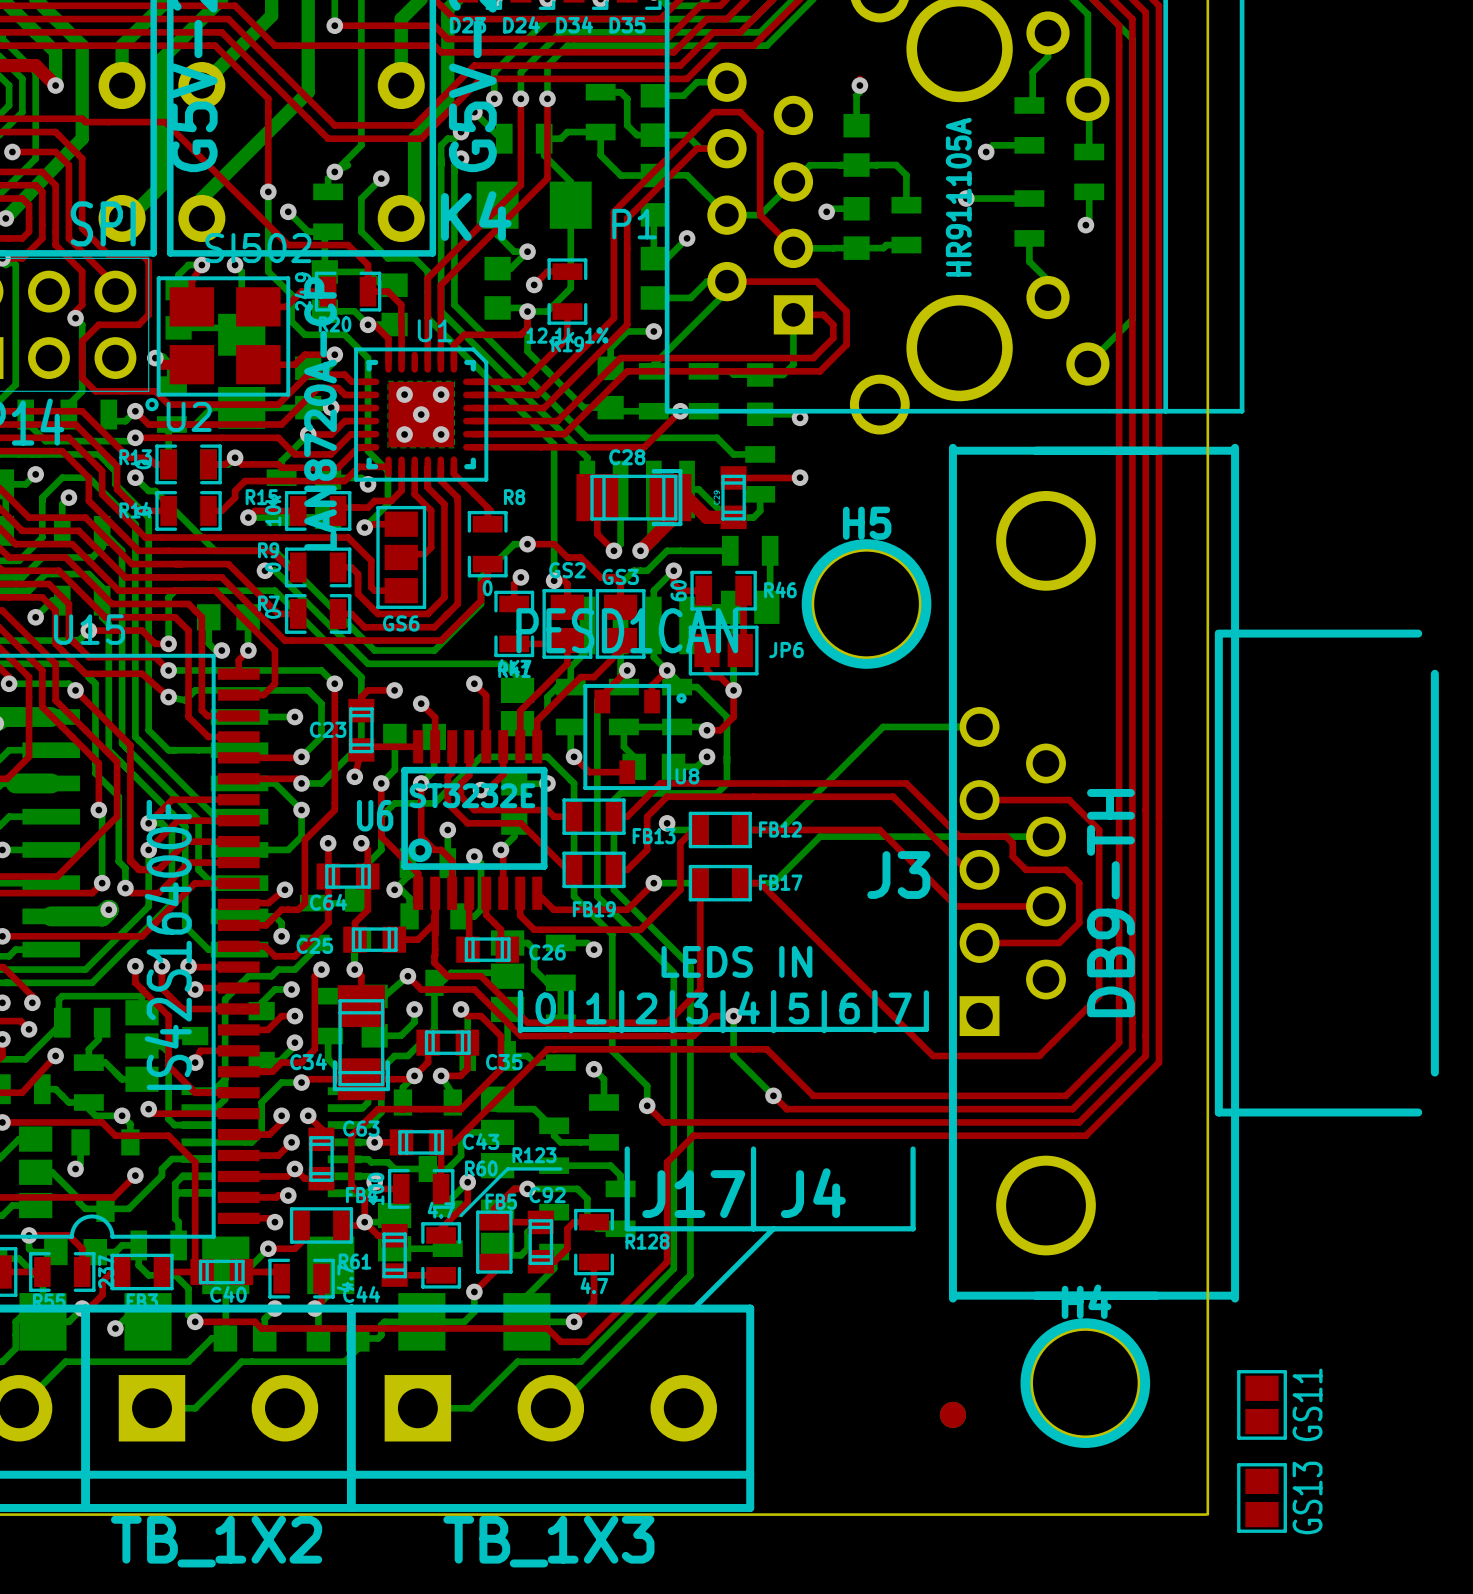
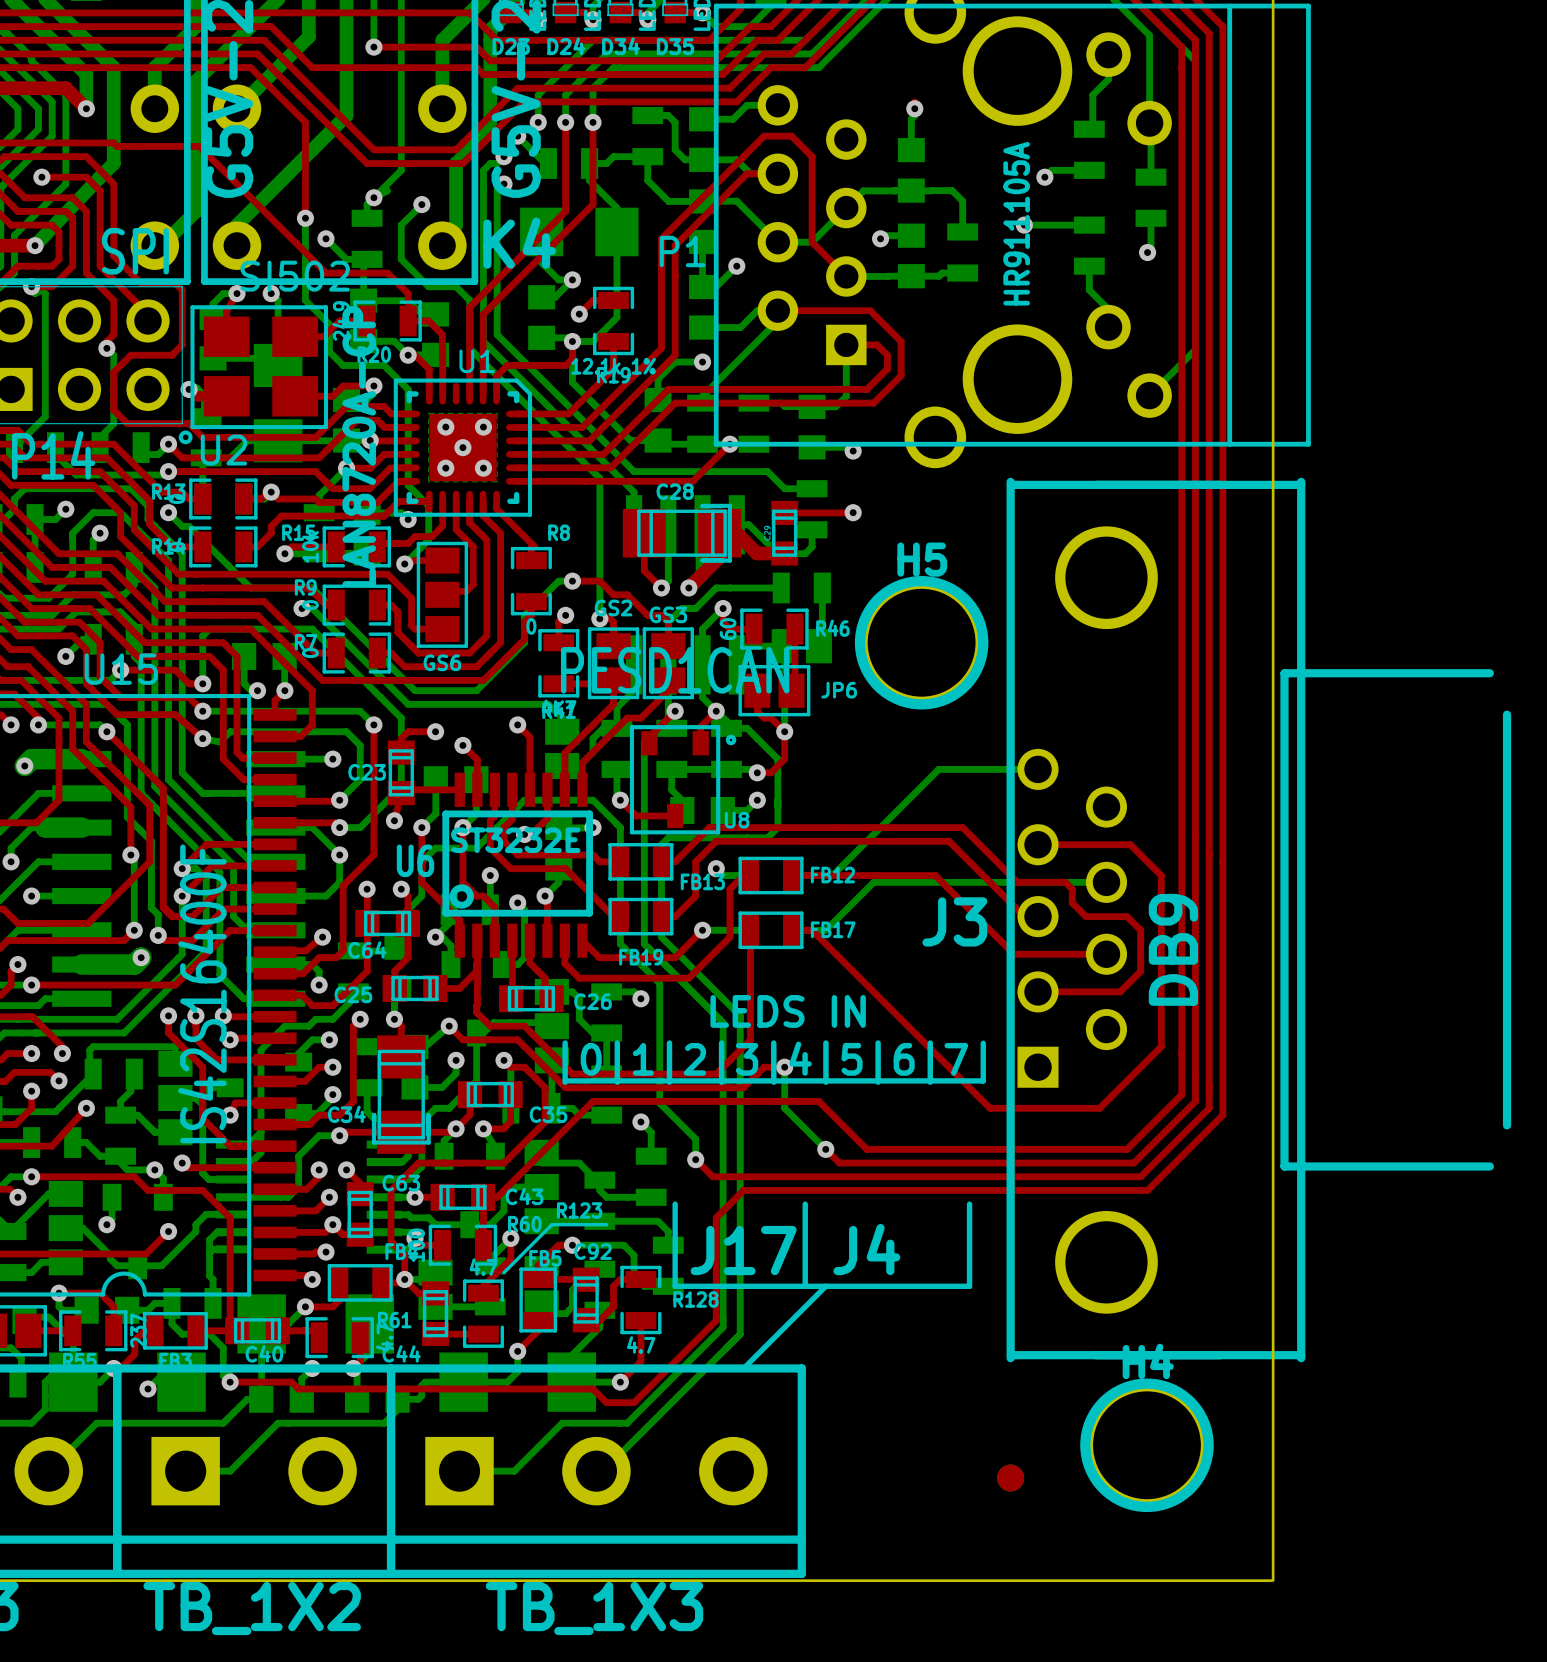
J3 value: DB9-TH (1110, 903) -> DB9 (1173, 949)
GS11: (1262, 1404) -> none
GS13: (1262, 1497) -> none

